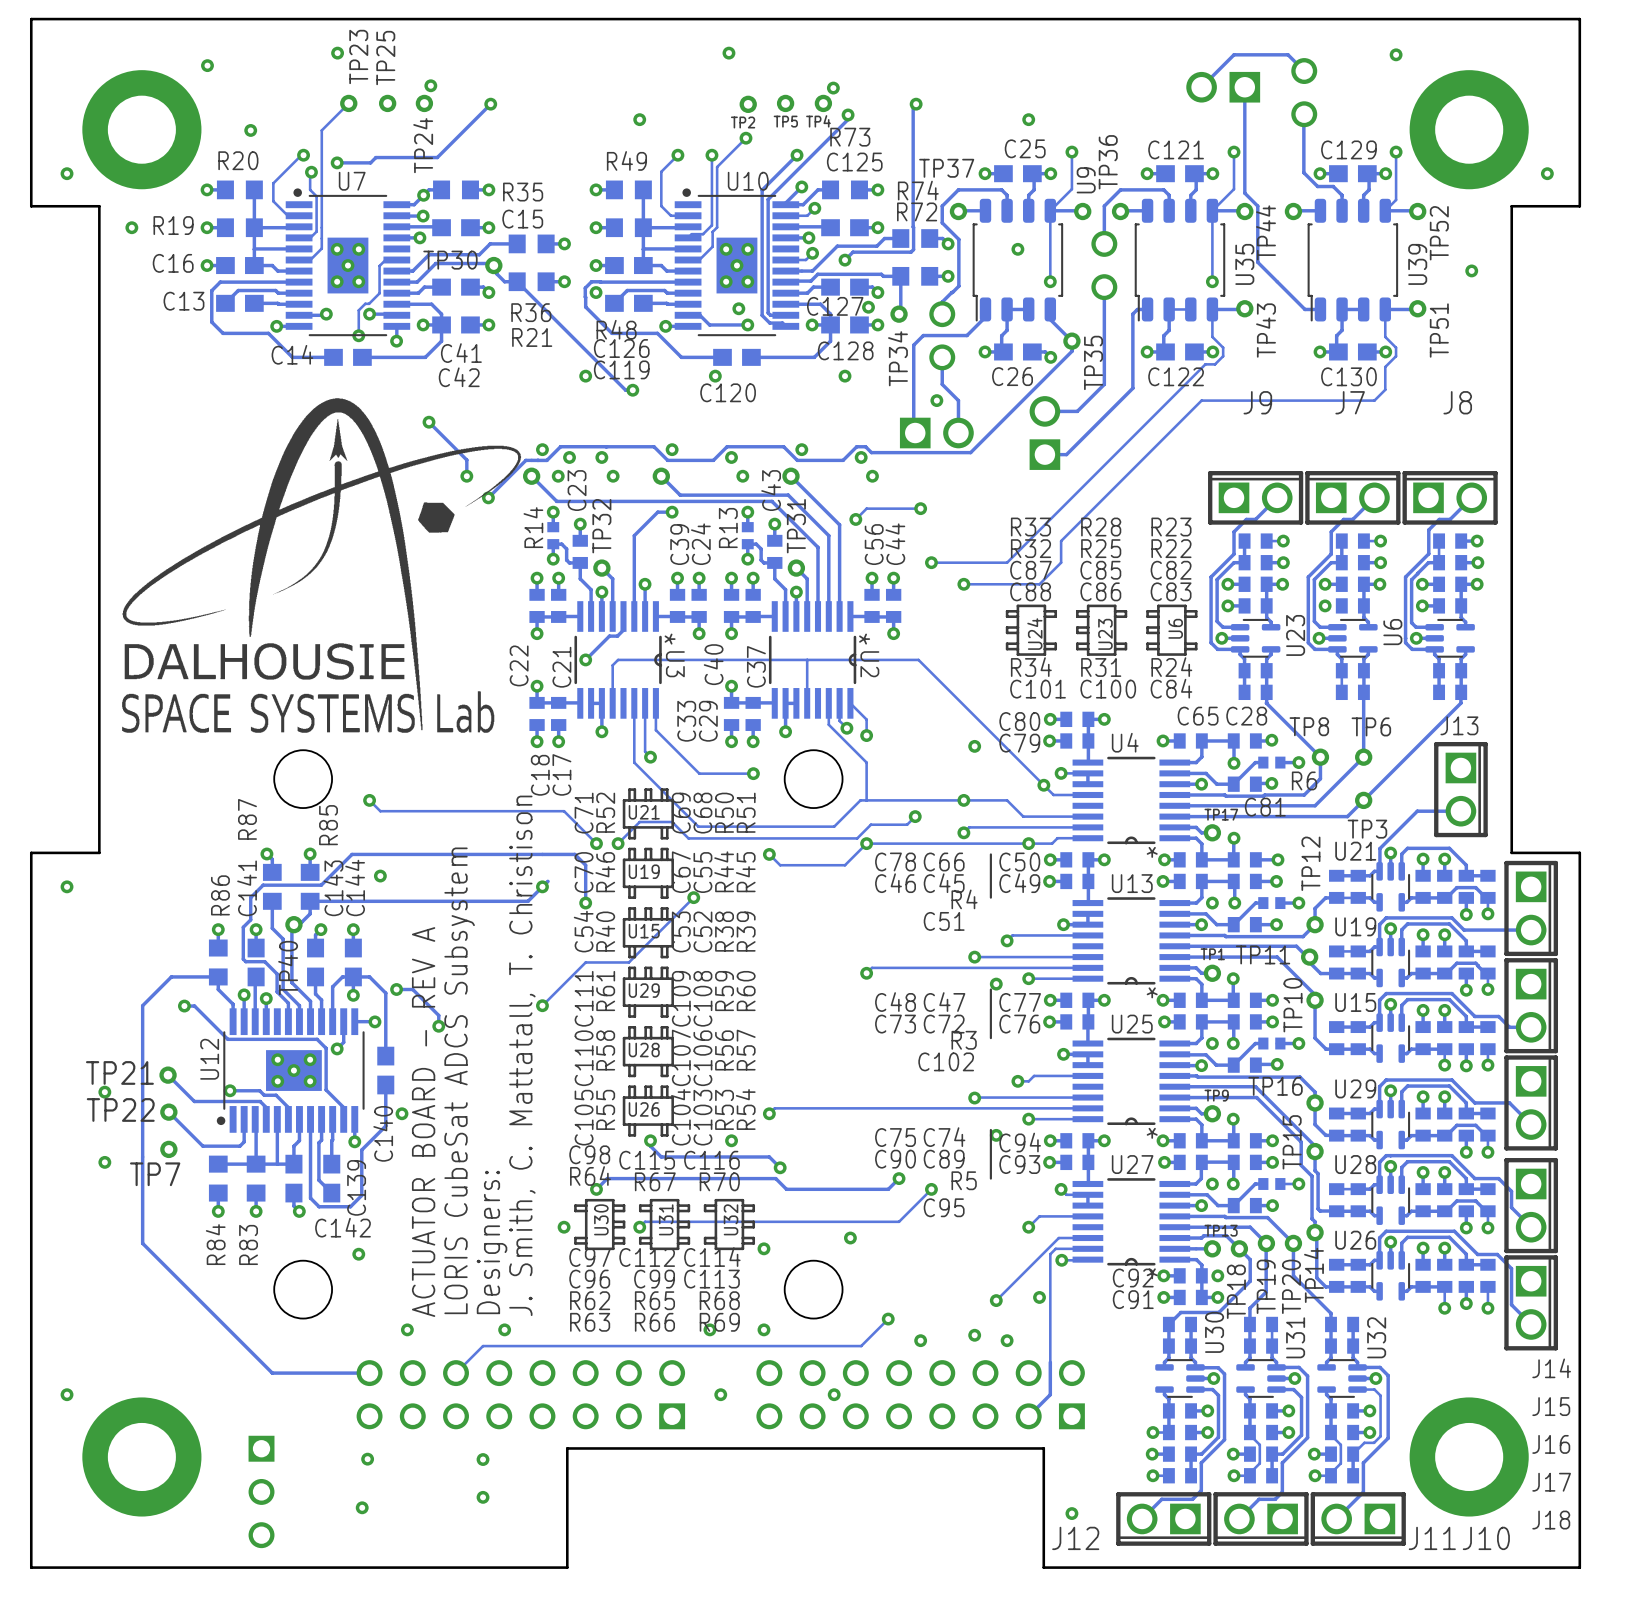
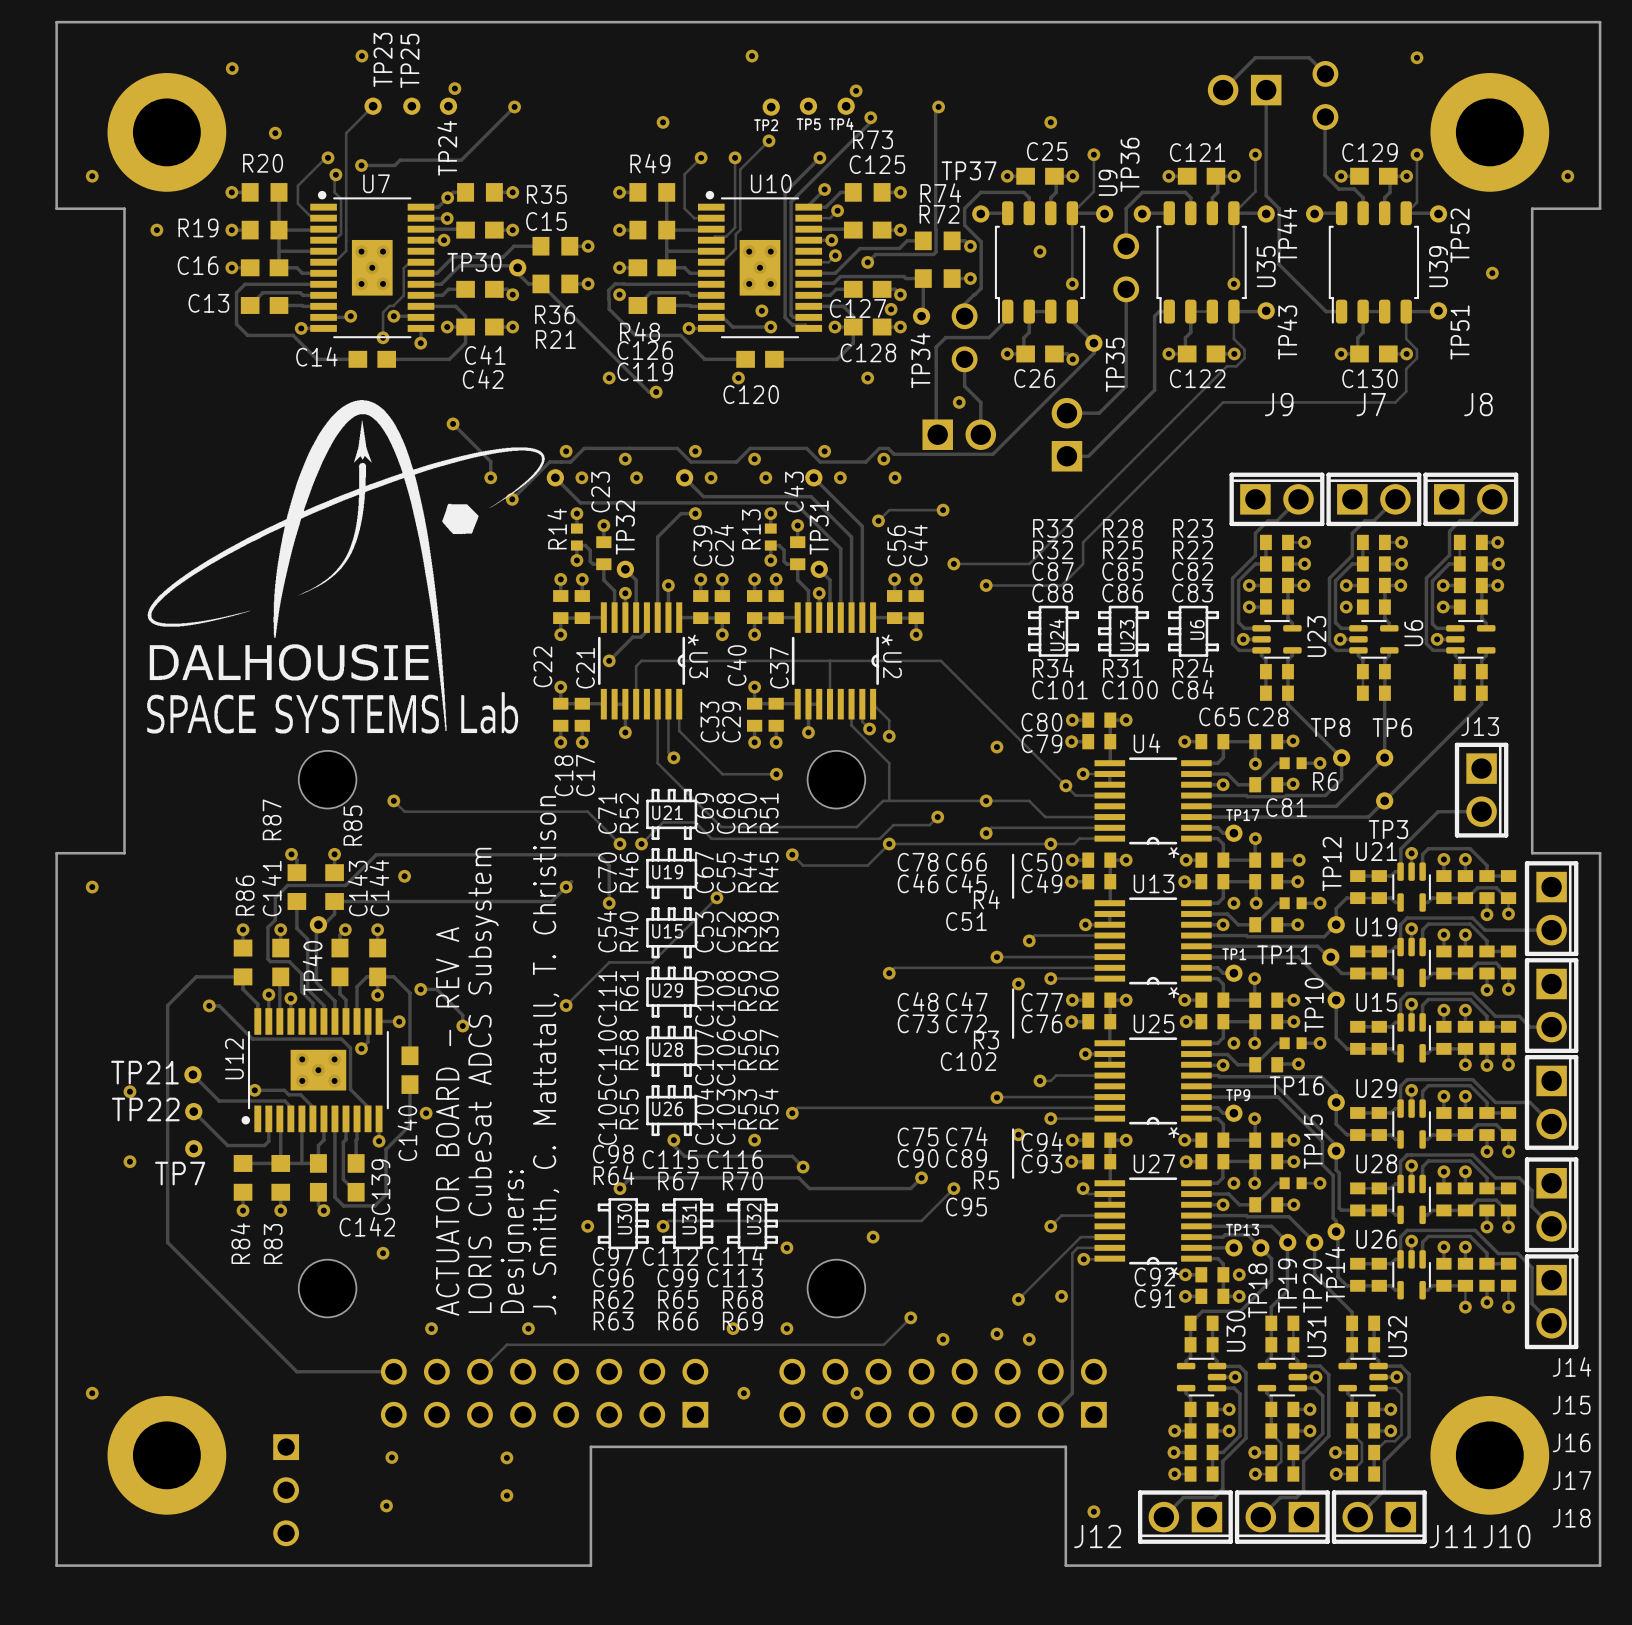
via: (569, 457) -> none
via: none -> (711, 477)
via: none -> (840, 477)

